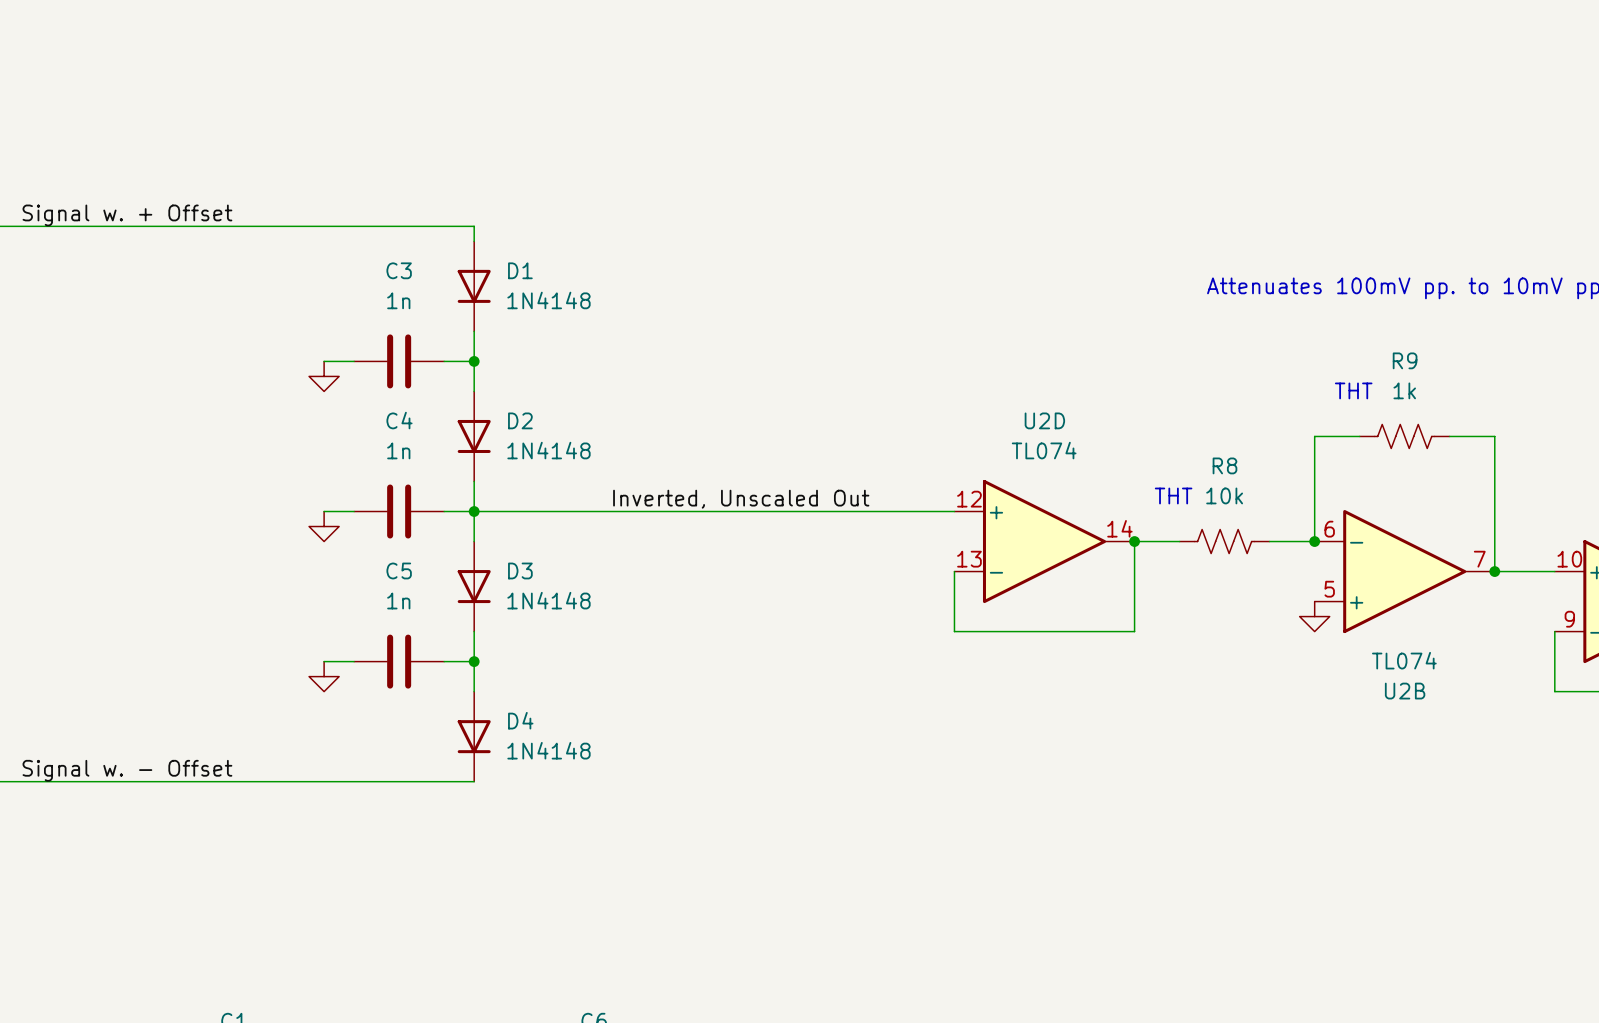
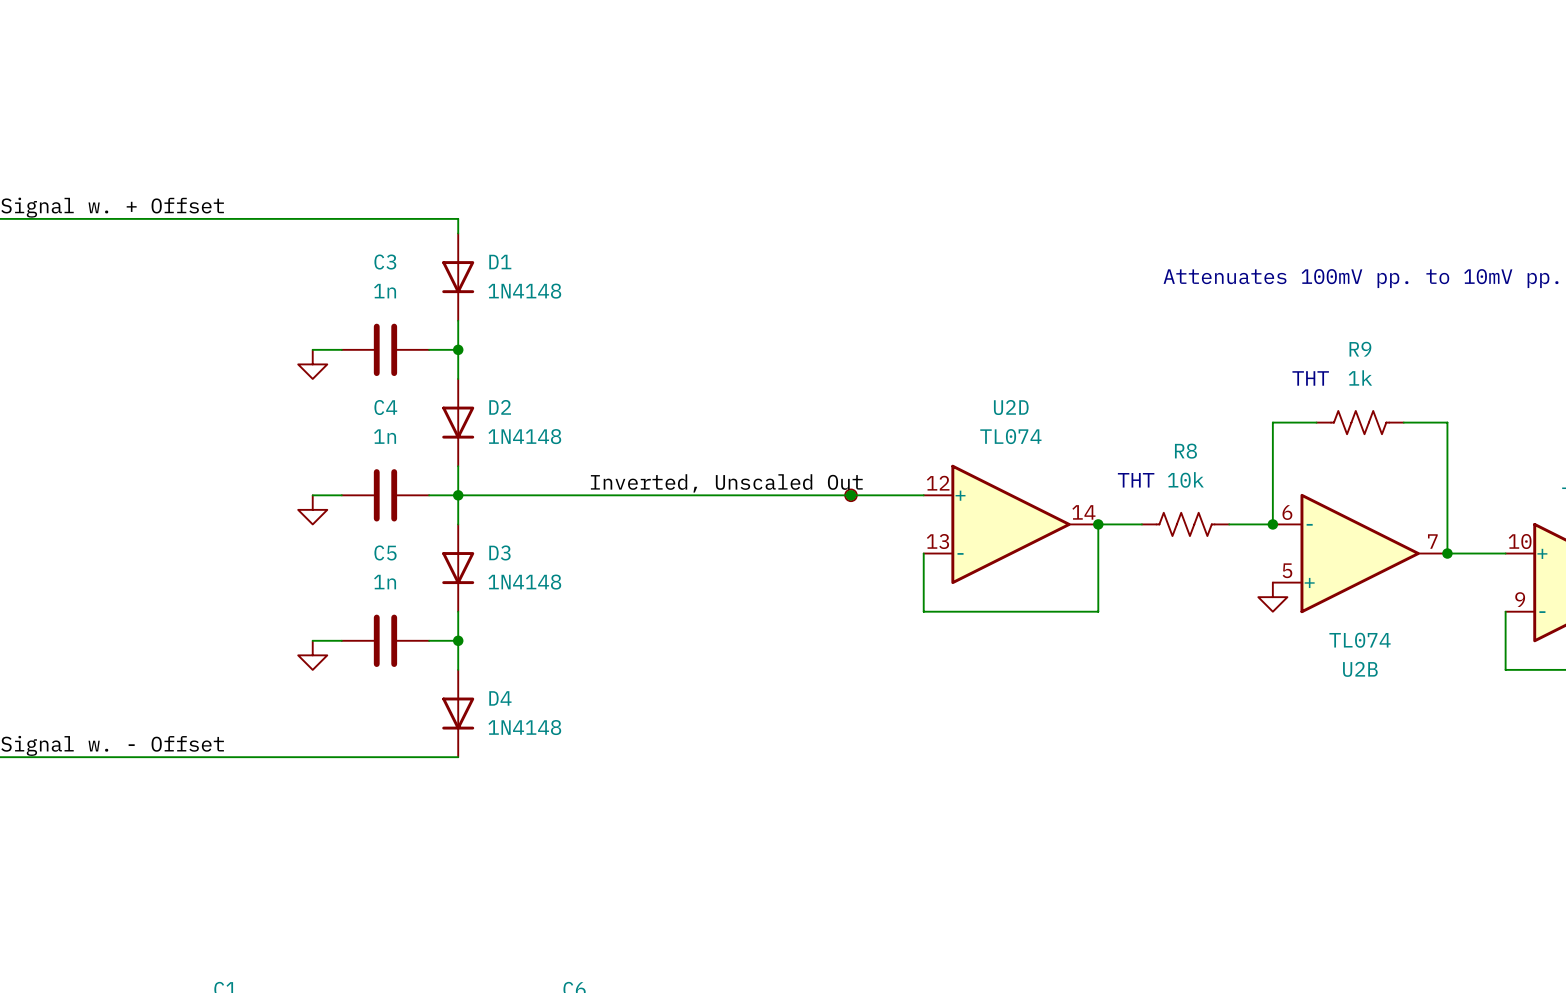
junction: none -> (850, 495)
part: none -> (850, 495)

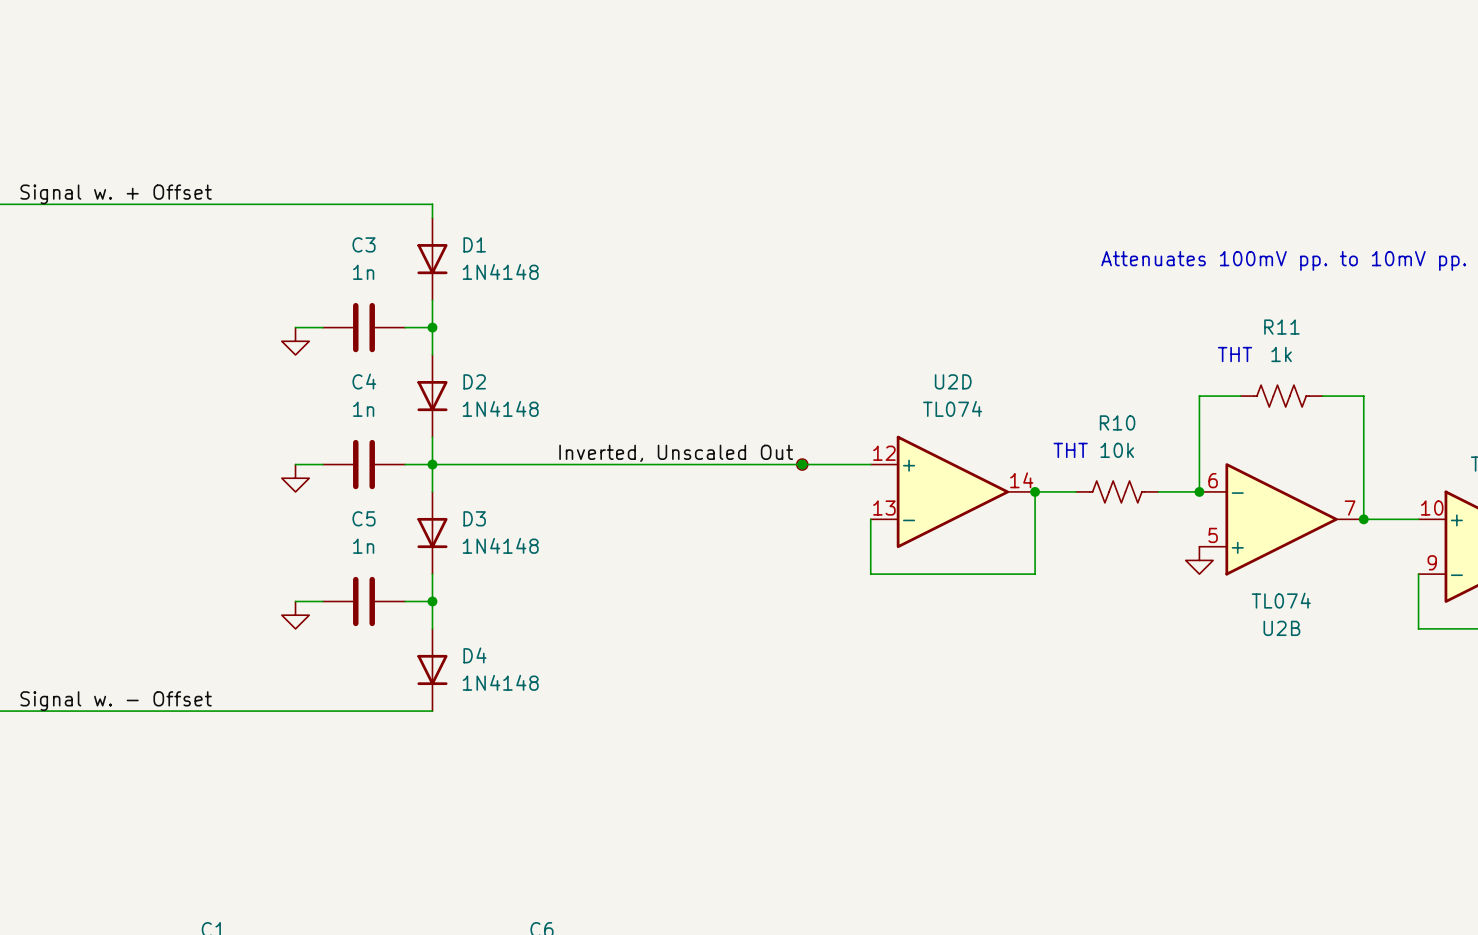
R9 name: R9 (1360, 349) -> R11 (1281, 327)
R8 name: R8 (1185, 451) -> R10 (1117, 422)

